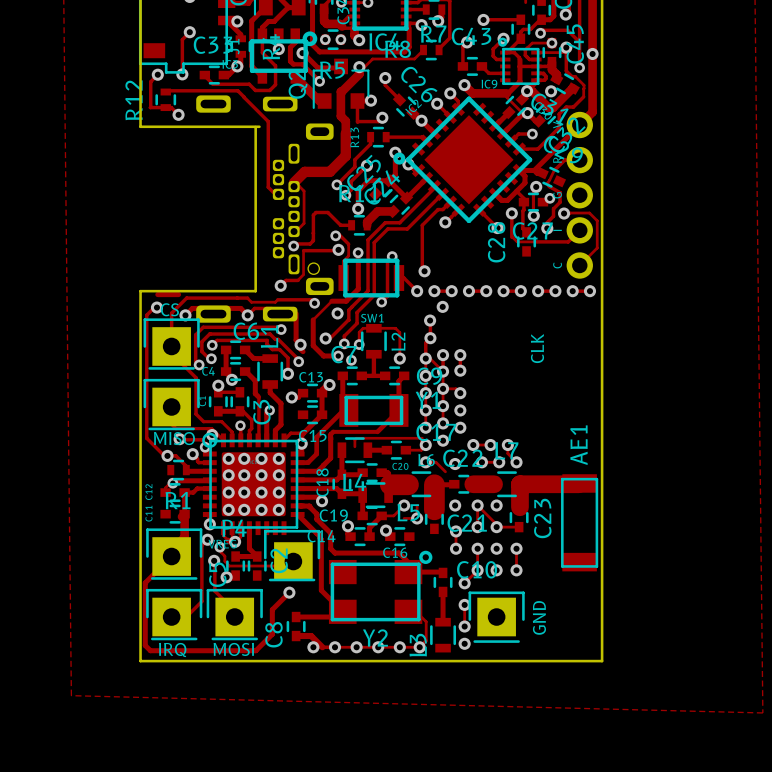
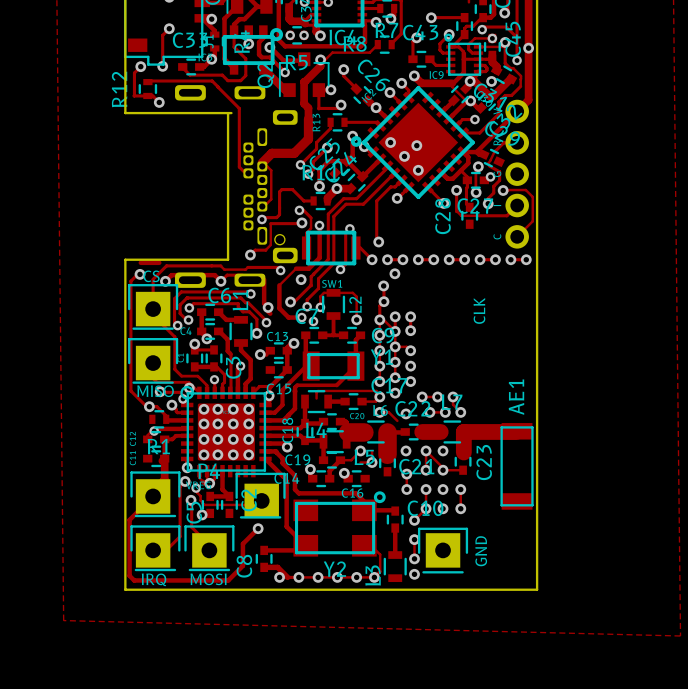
via: none -> (390, 142)
via: none -> (416, 145)
via: none -> (404, 156)
via: none -> (418, 170)
via: none -> (336, 188)

